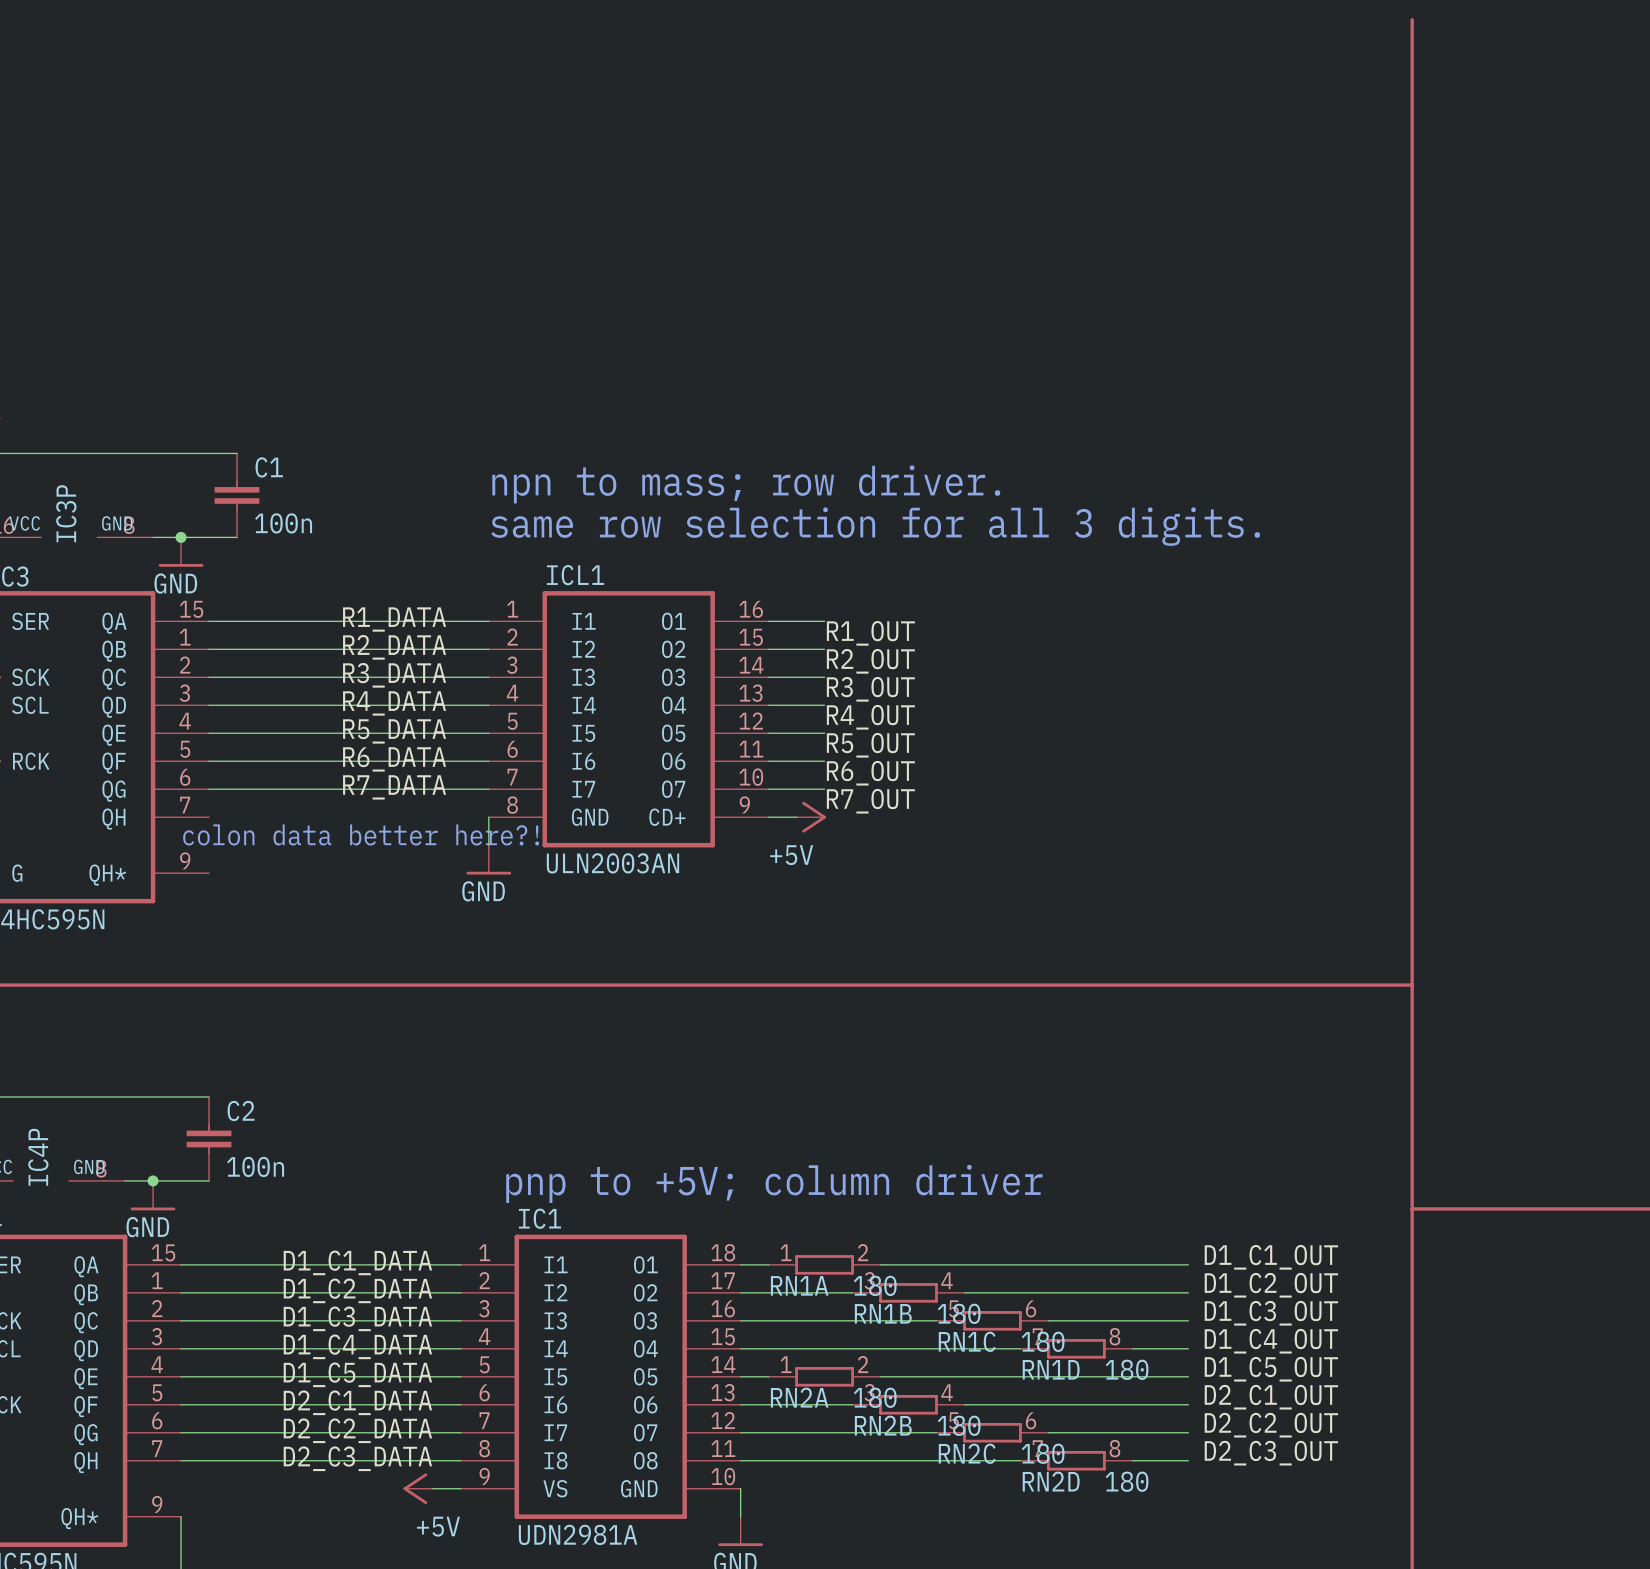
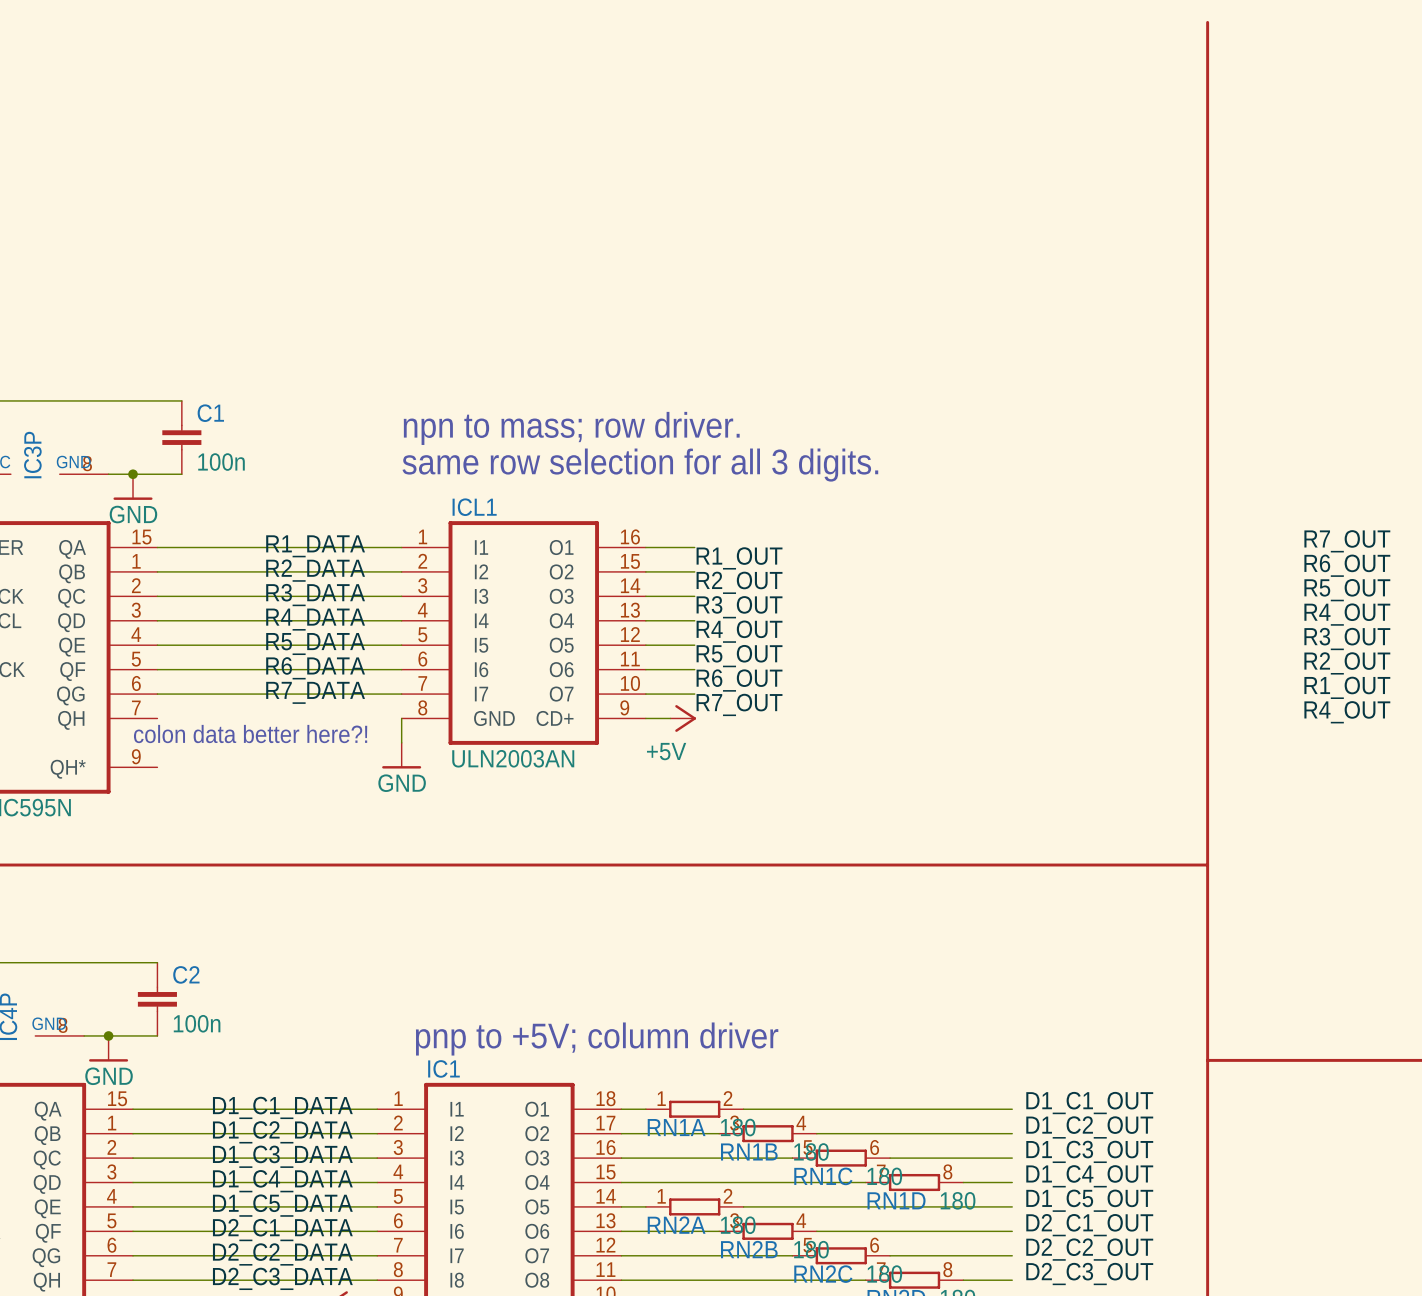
label: none -> R7_OUT (1347, 541)
label: none -> R6_OUT (1347, 565)
label: none -> R5_OUT (1347, 590)
label: none -> R4_OUT (1347, 614)
label: none -> R3_OUT (1347, 639)
label: none -> R2_OUT (1347, 663)
label: none -> R1_OUT (1347, 687)
label: none -> R4_OUT (1347, 712)

